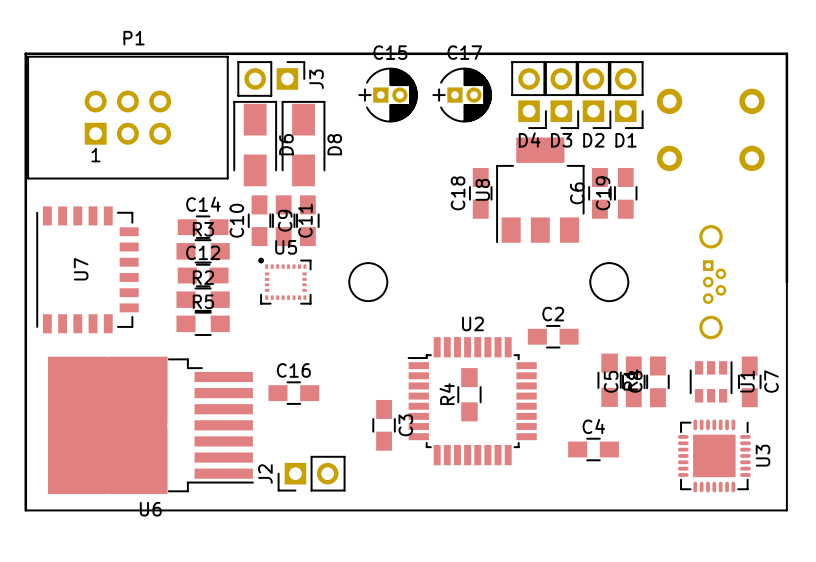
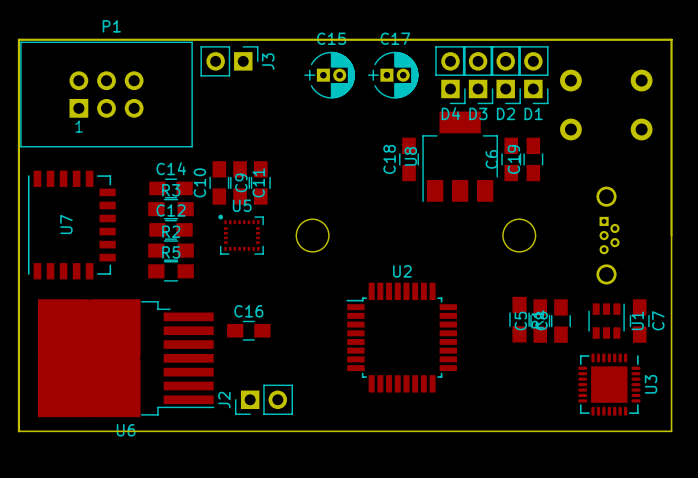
D6: (255, 143) -> none
D8: (303, 143) -> none
C2: (553, 336) -> none
R4: (469, 394) -> none
C3: (384, 425) -> none
C4: (593, 449) -> none

